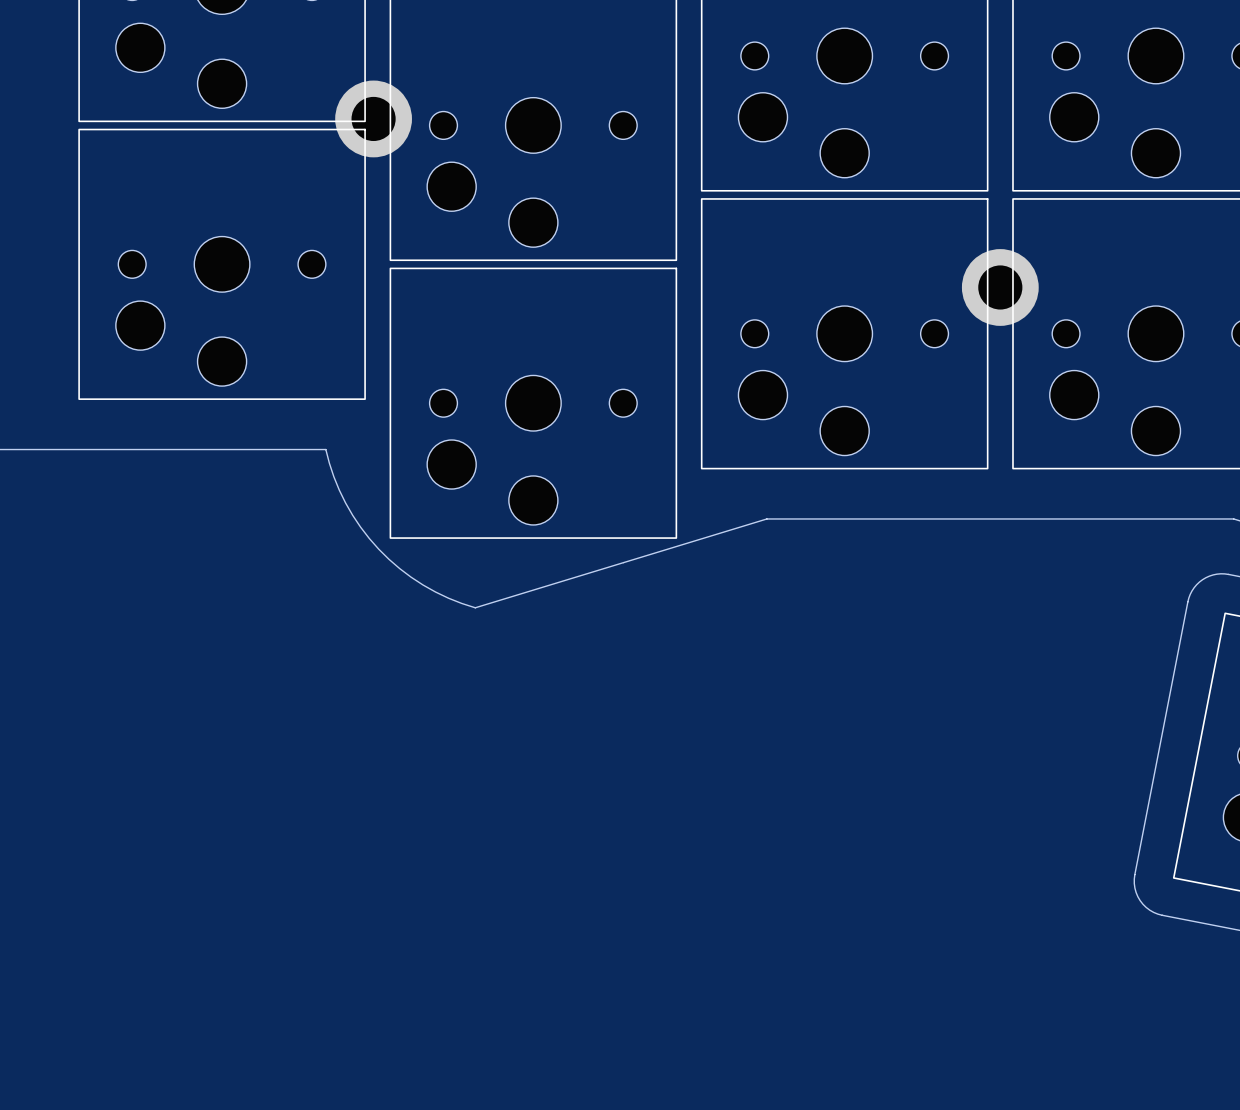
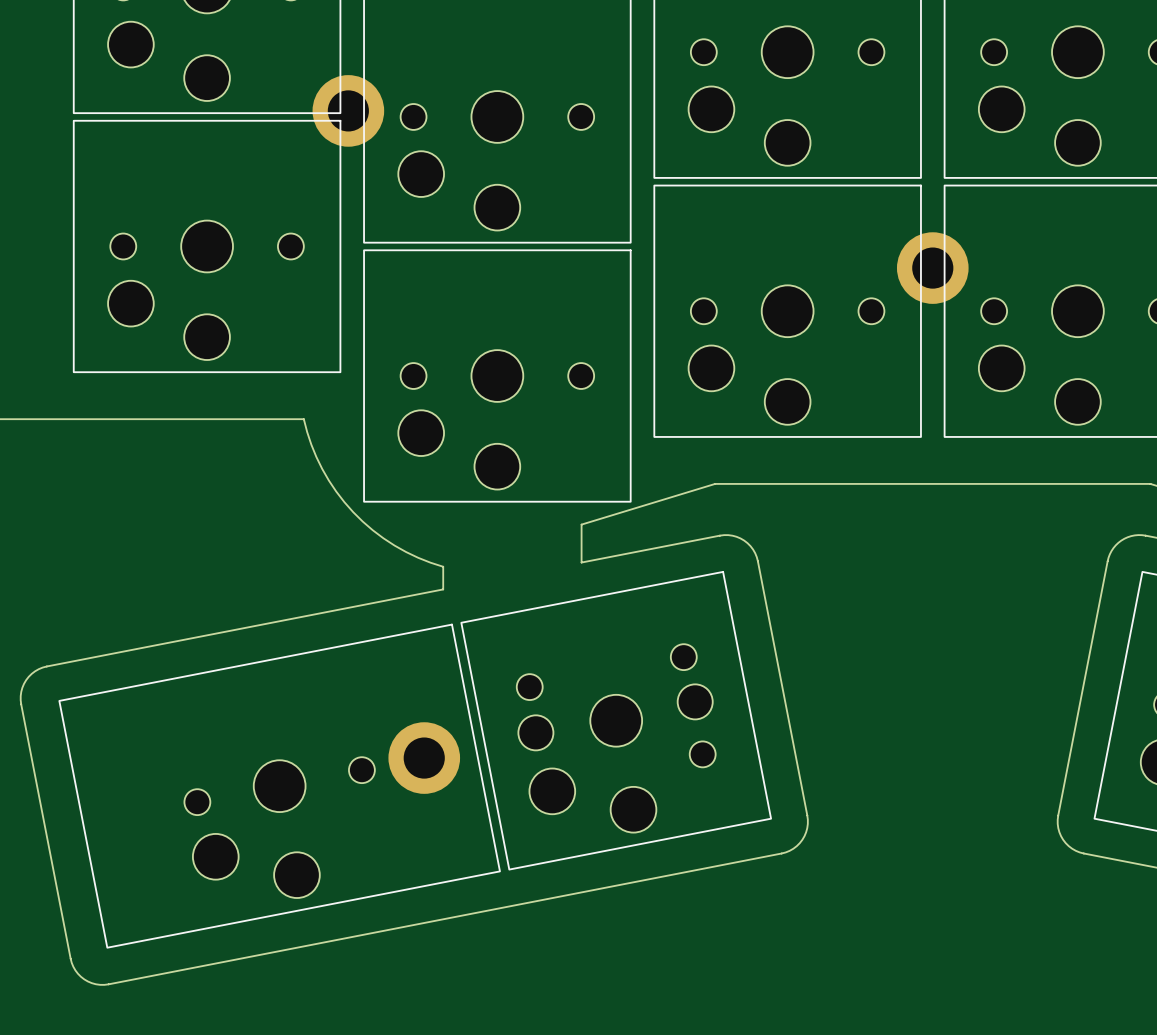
board edge: (623, 562) (475, 607) -> (581, 524) (581, 562) (724, 535) (740, 538) (753, 549) (757, 561) (807, 815) (806, 832) (796, 846) (781, 853) (108, 984) (91, 983) (80, 976) (75, 970) (70, 958) (21, 704) (21, 691) (28, 676) (35, 671) (46, 666) (443, 589) (443, 566)
part: none -> (616, 720)
part: none -> (424, 758)
part: none -> (279, 786)

